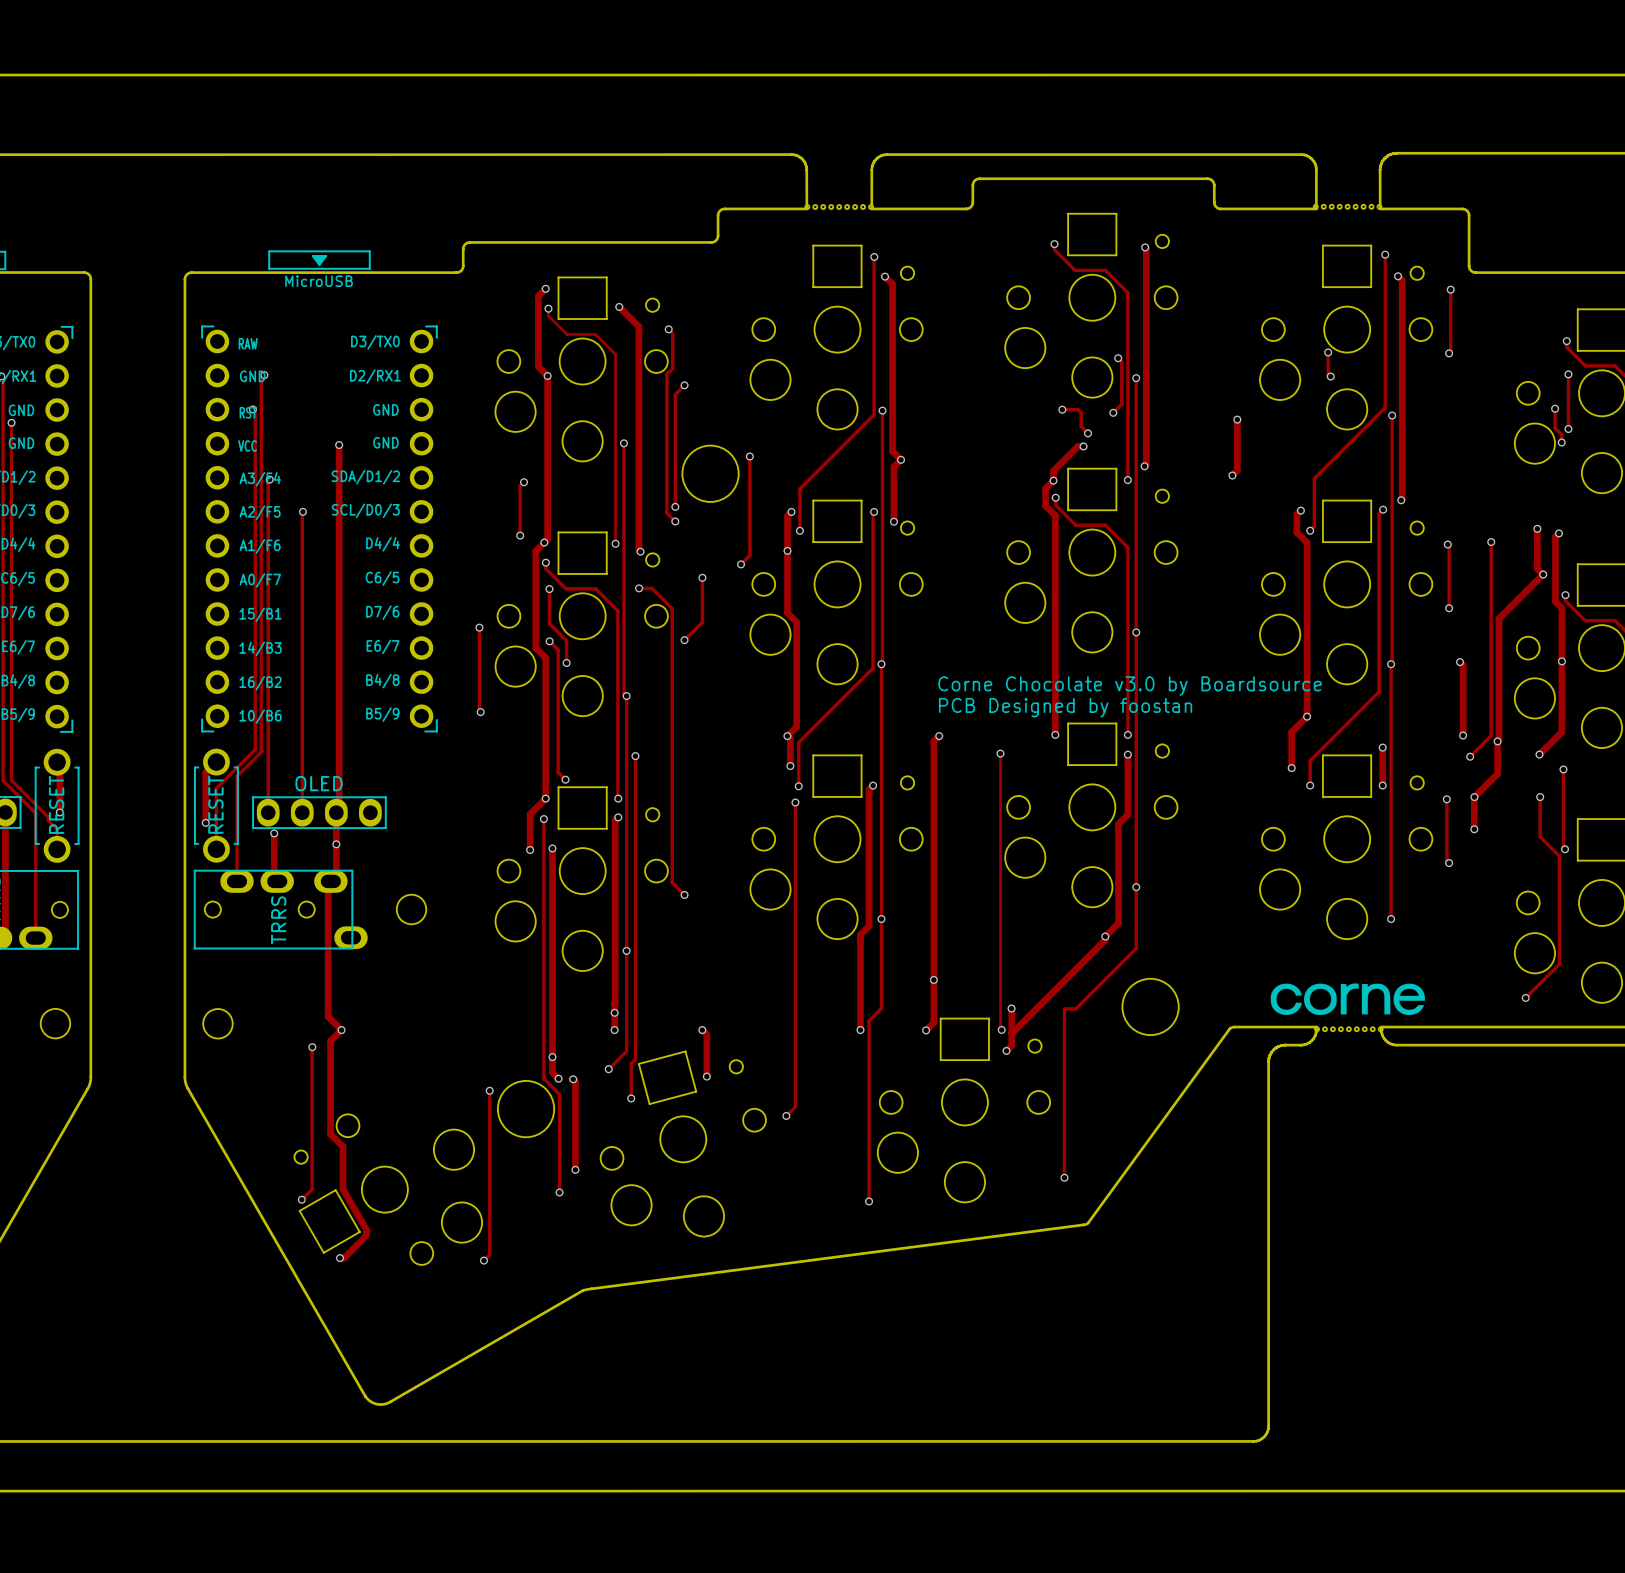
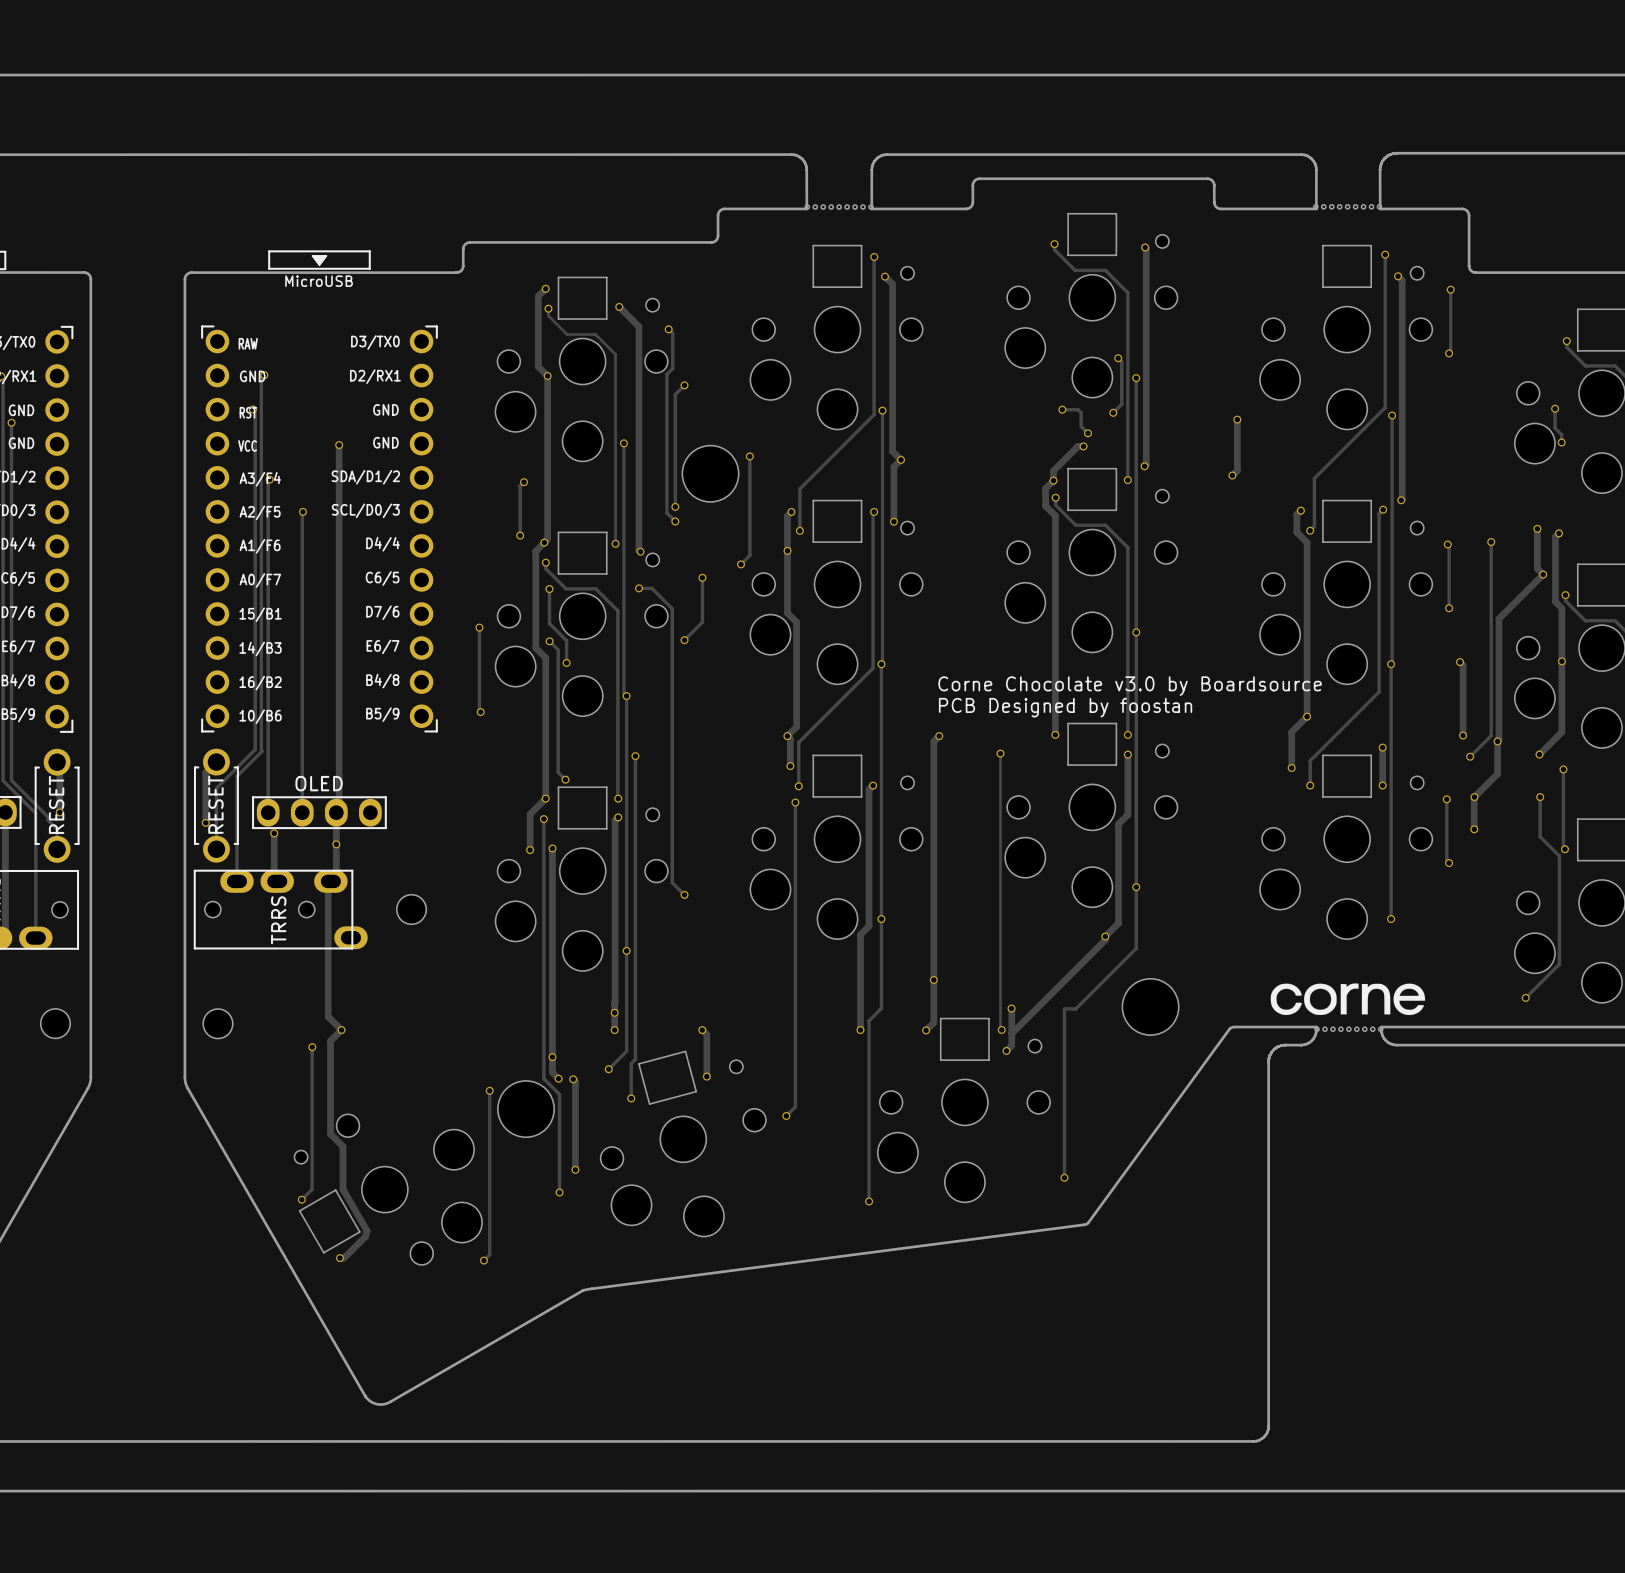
track: (1328, 352) (1328, 373) (1330, 376) -> none
via: (1328, 352) -> none
track: (1568, 374) (1568, 429) -> none
via: (1568, 374) -> none
via: (1330, 376) -> none
via: (1568, 429) -> none

